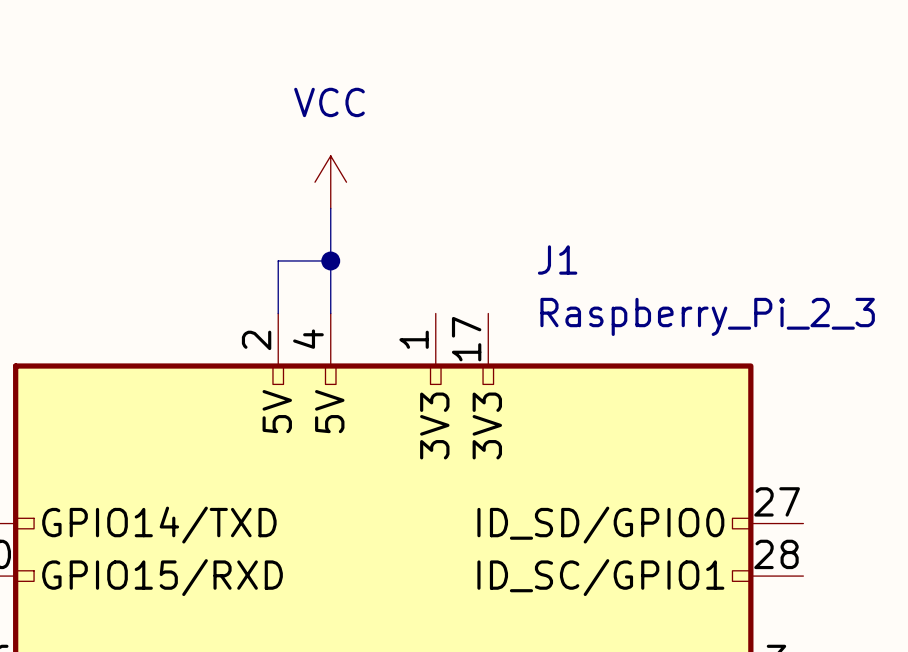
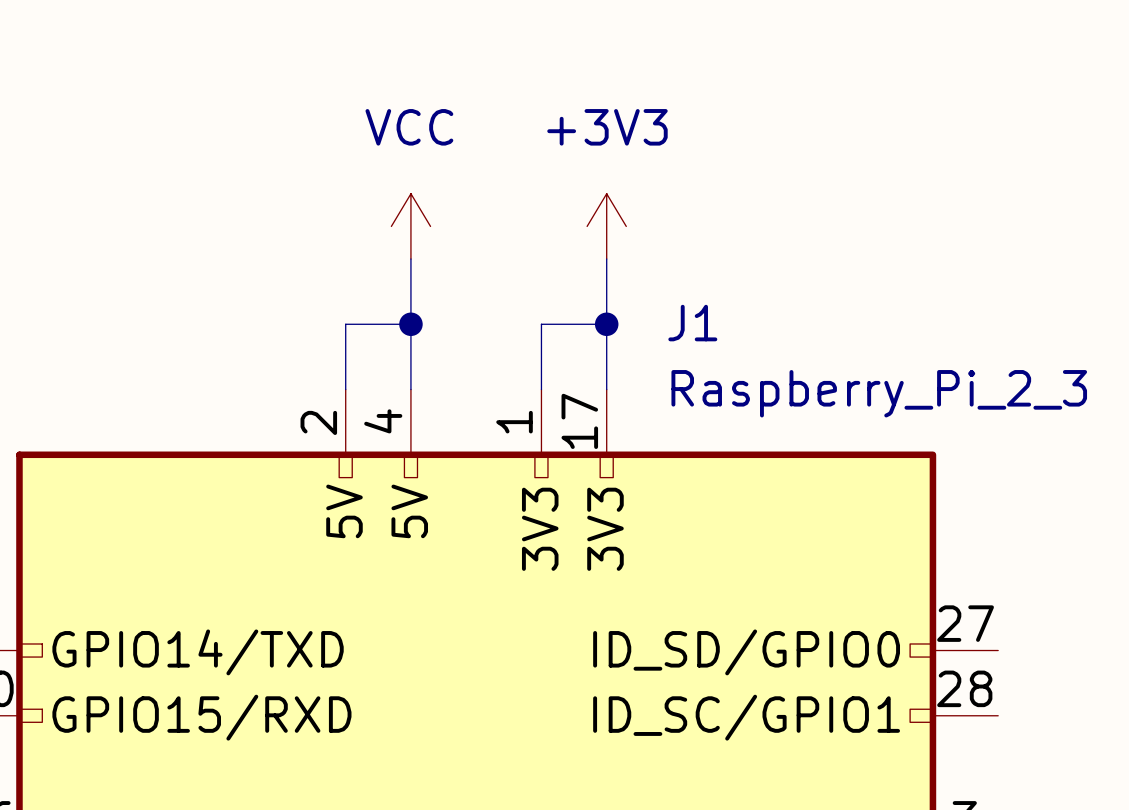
power symbol: none -> +3V3 (606, 226)
wire: none -> (606, 259) (606, 389)
wire: none -> (606, 324) (541, 324) (541, 389)
junction: none -> (606, 324)

